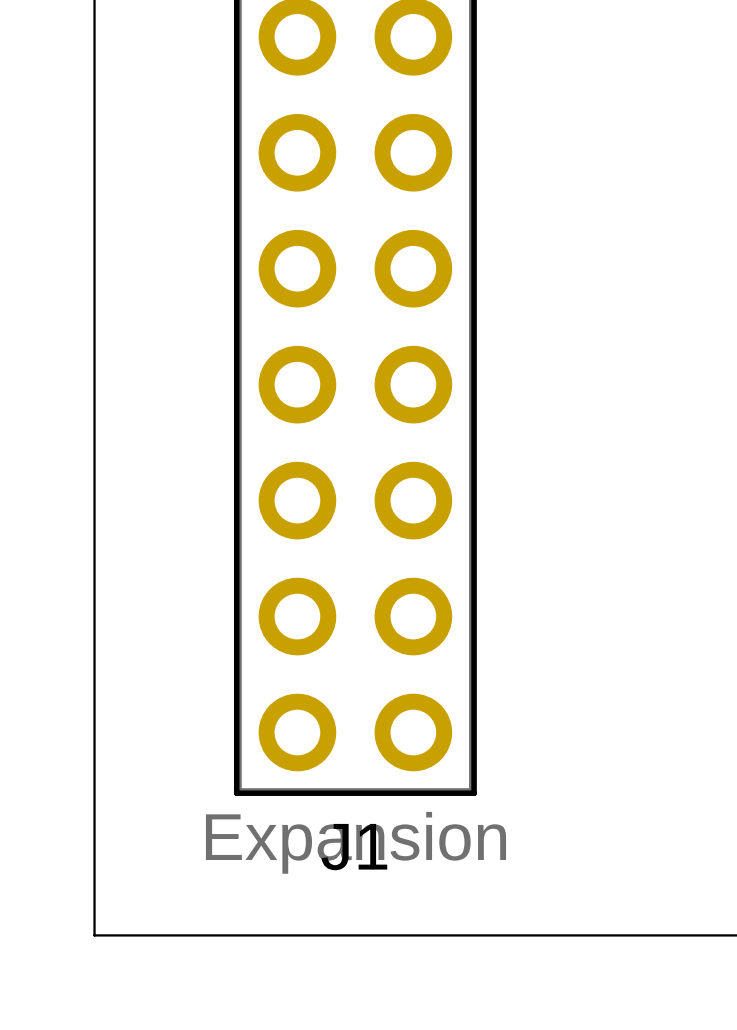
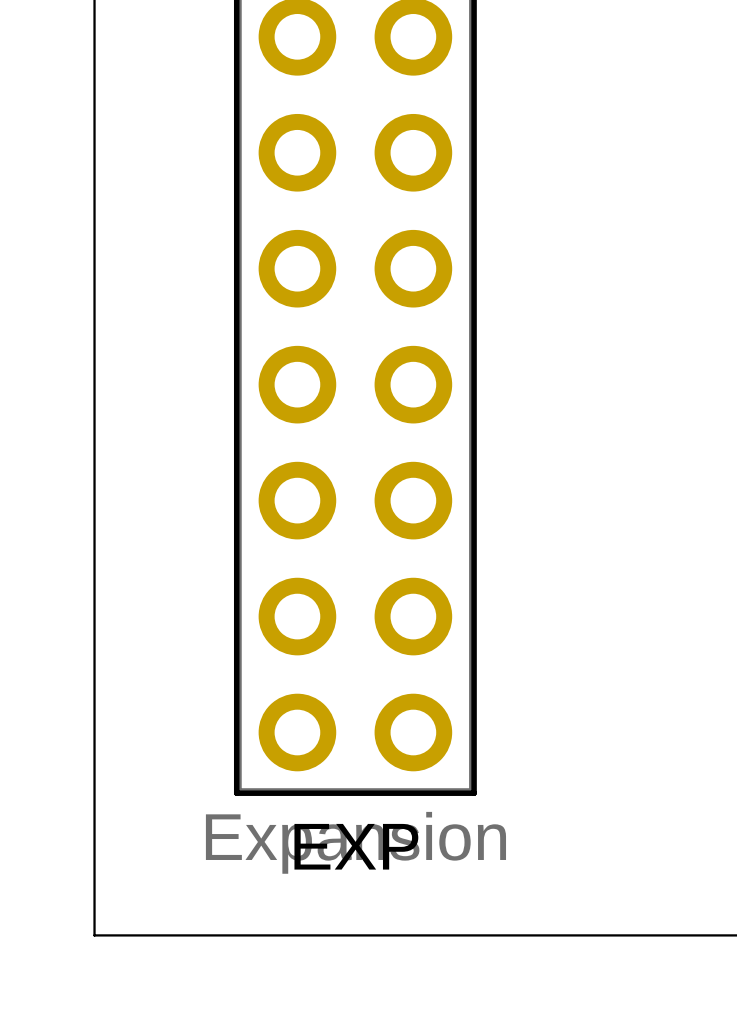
J1 name: J1 (354, 847) -> EXP (356, 846)

